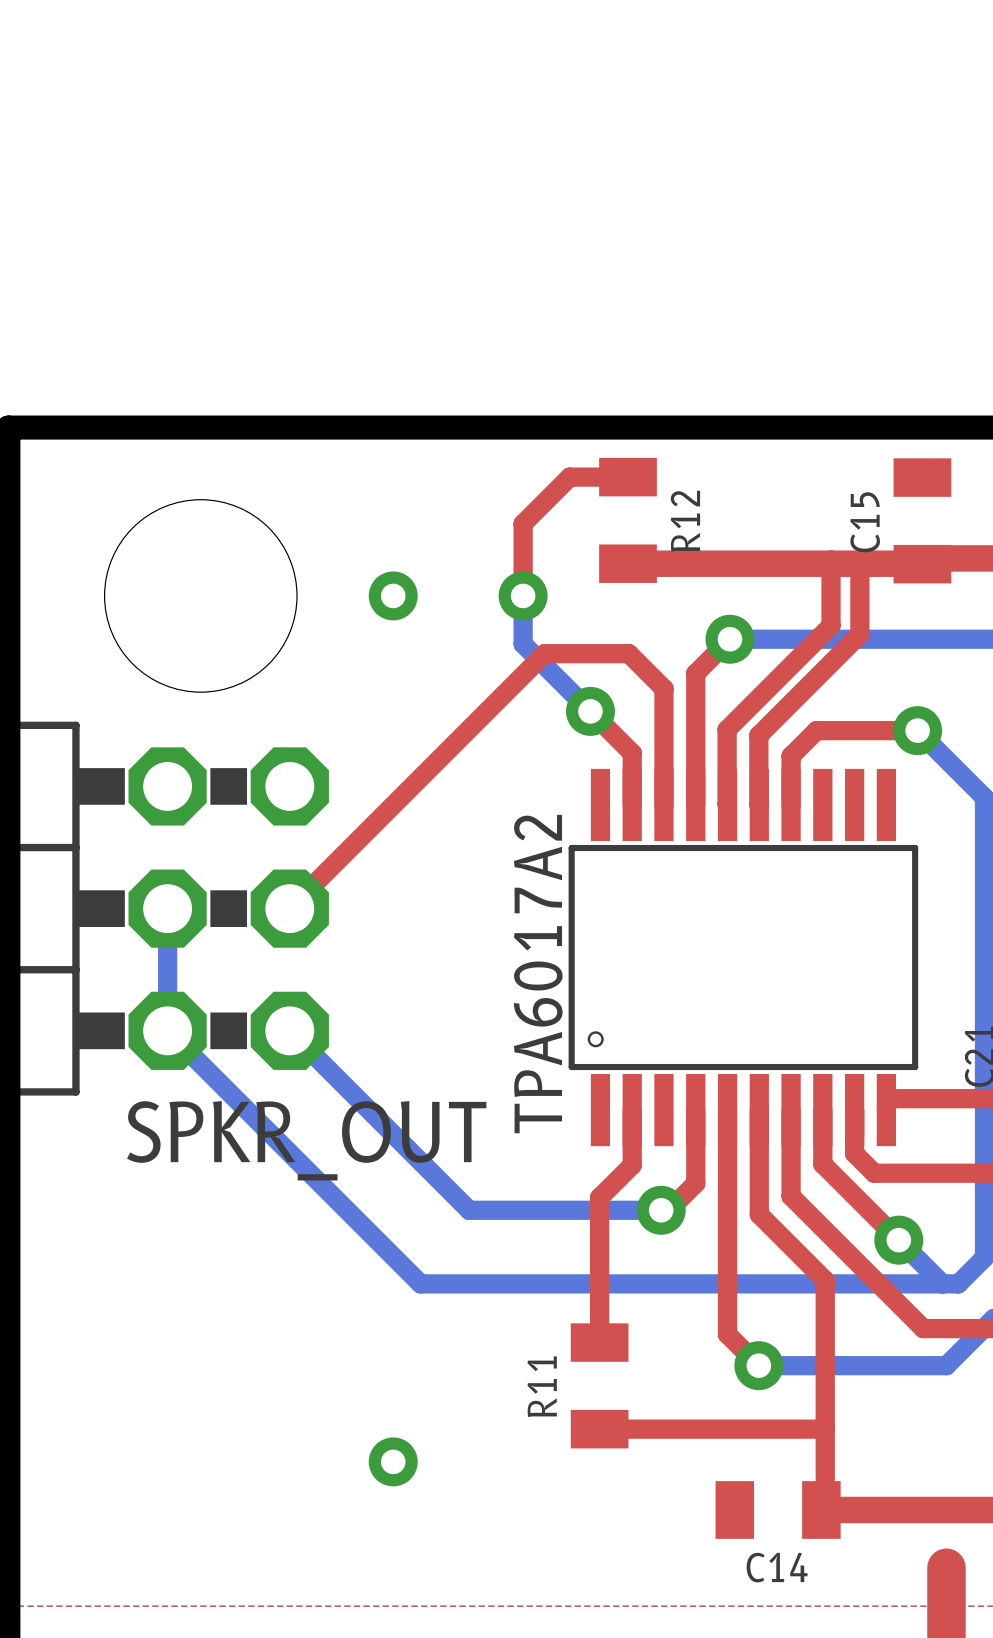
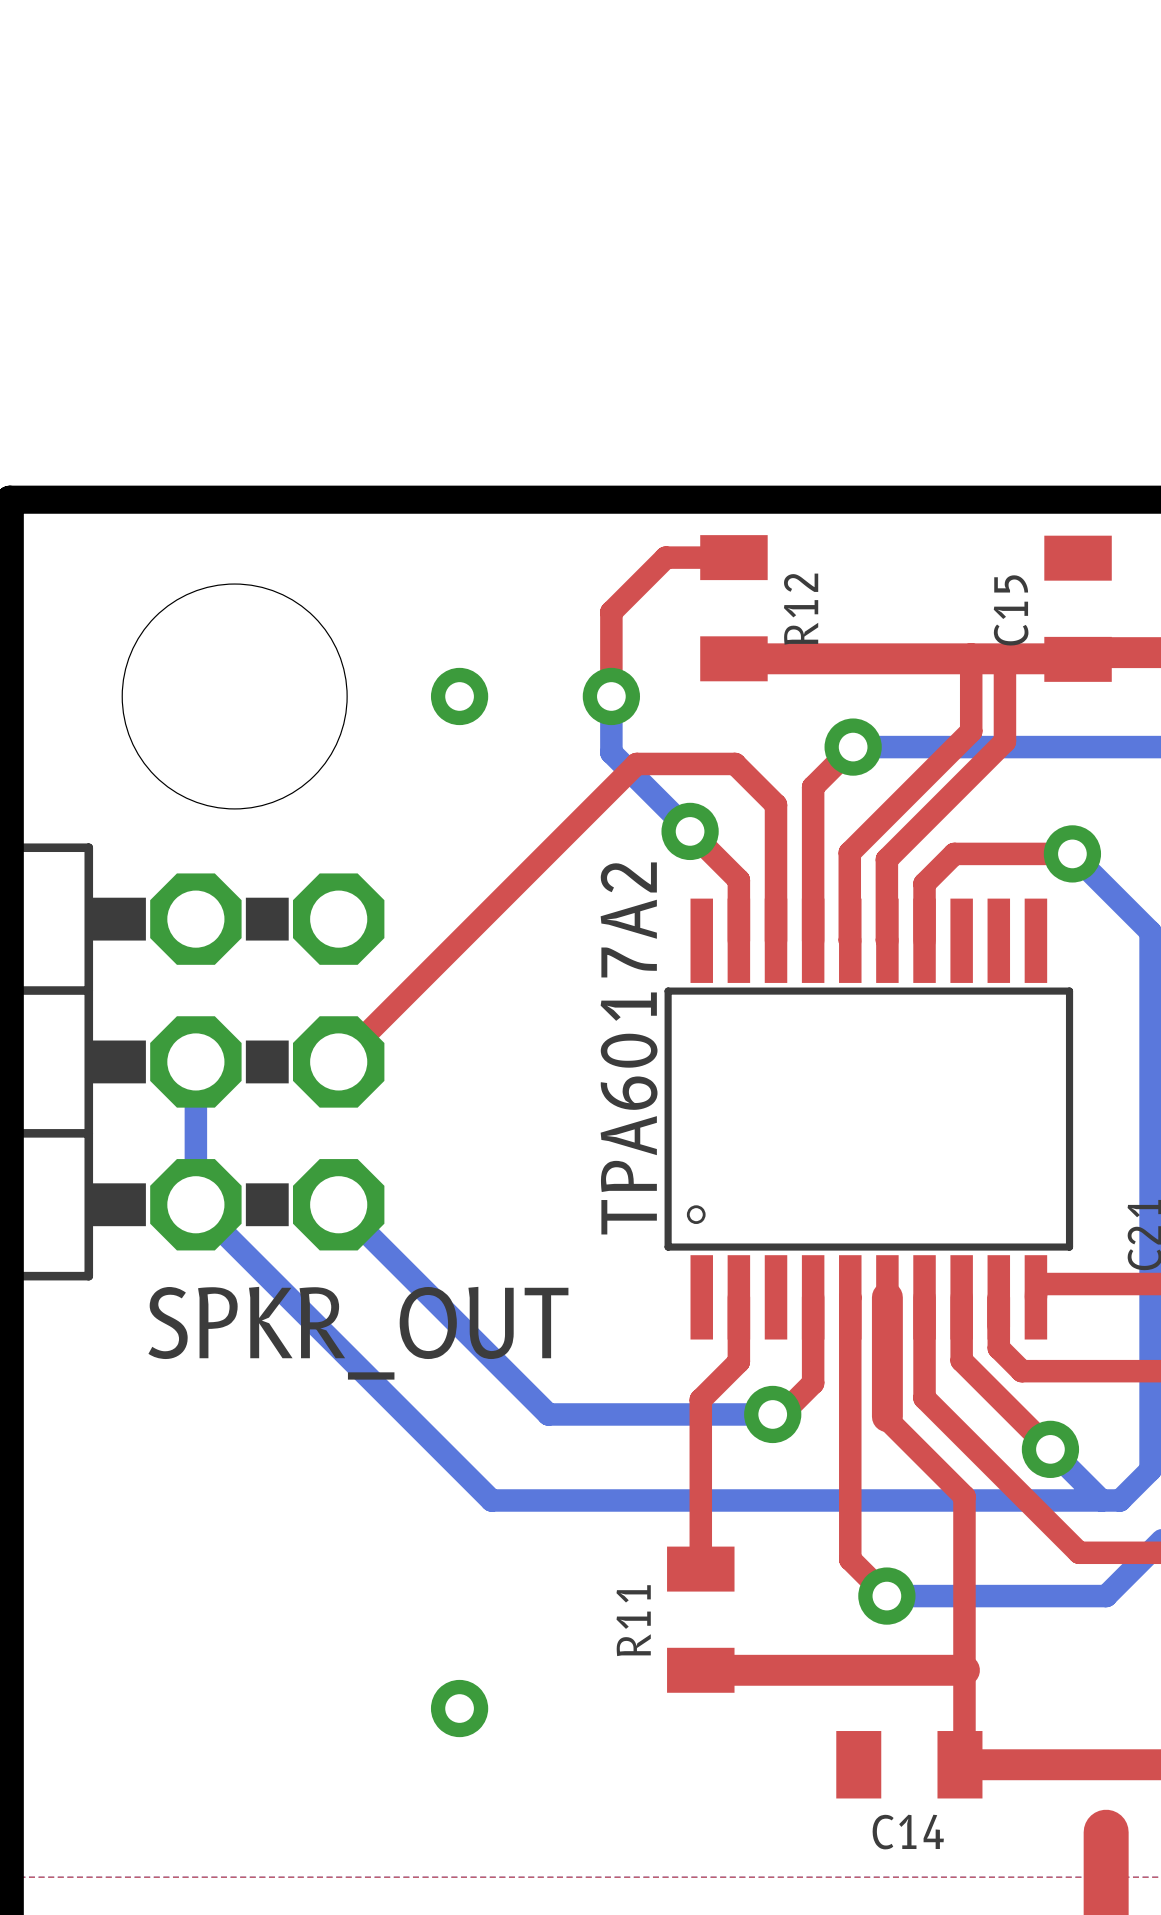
TPA6017A2 name position: TPA6017A2 (538, 974) -> TPA6017A2 (629, 1048)
top track width: thin (759, 1110) (759, 1212) -> thick (887, 1297) (887, 1416)
top track width: thin (599, 1429) (825, 1429) -> thick (700, 1670) (964, 1670)

